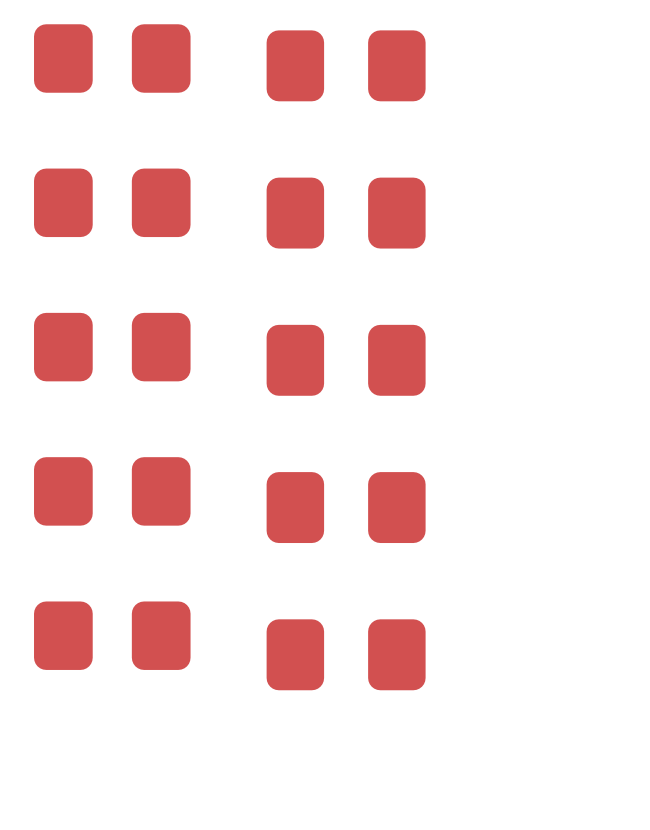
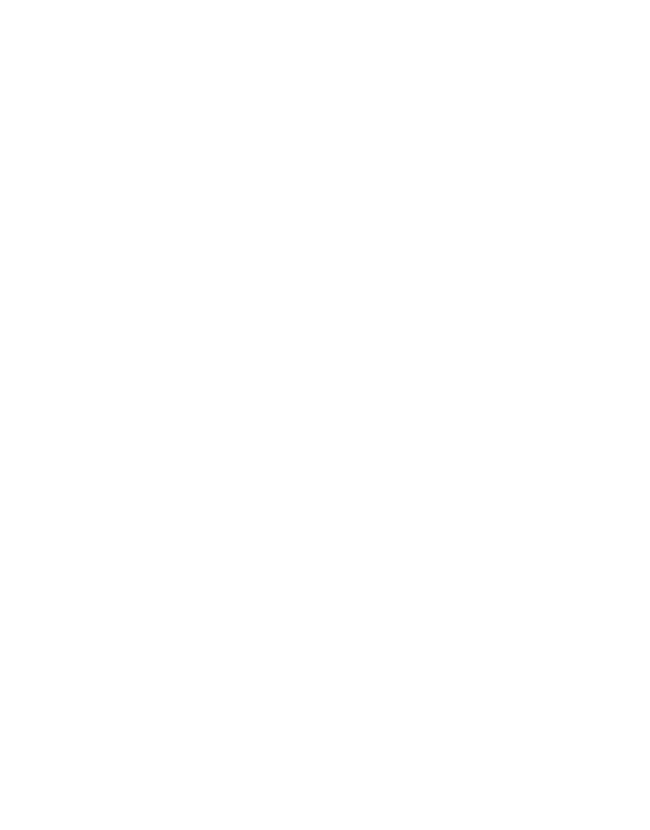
part: (112, 58) -> none
part: (346, 65) -> none
part: (112, 202) -> none
part: (346, 213) -> none
part: (112, 347) -> none
part: (346, 360) -> none
part: (112, 491) -> none
part: (346, 507) -> none
part: (112, 635) -> none
part: (346, 654) -> none

